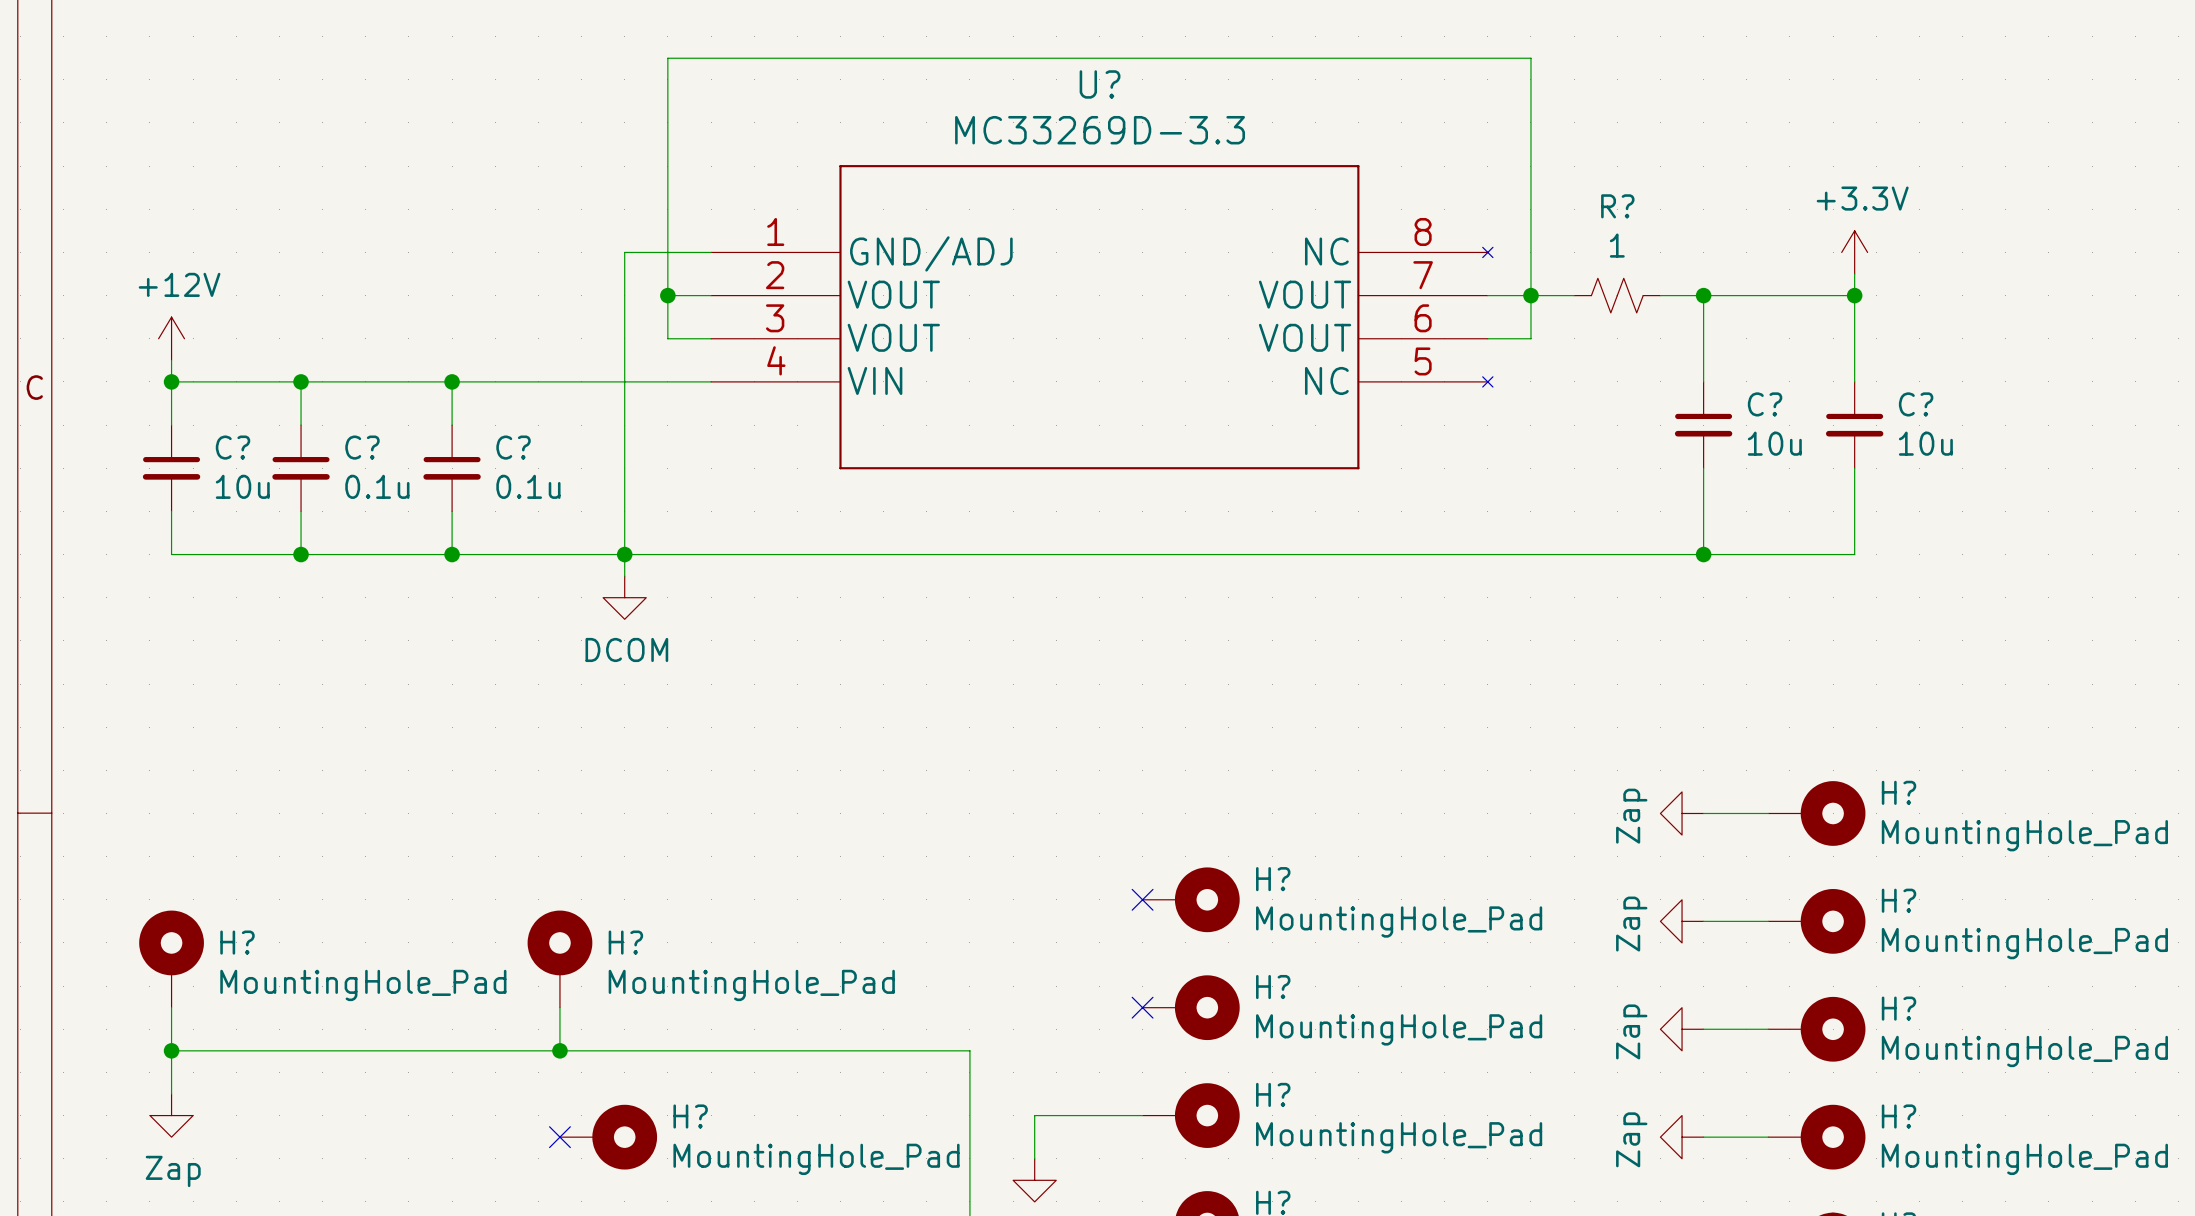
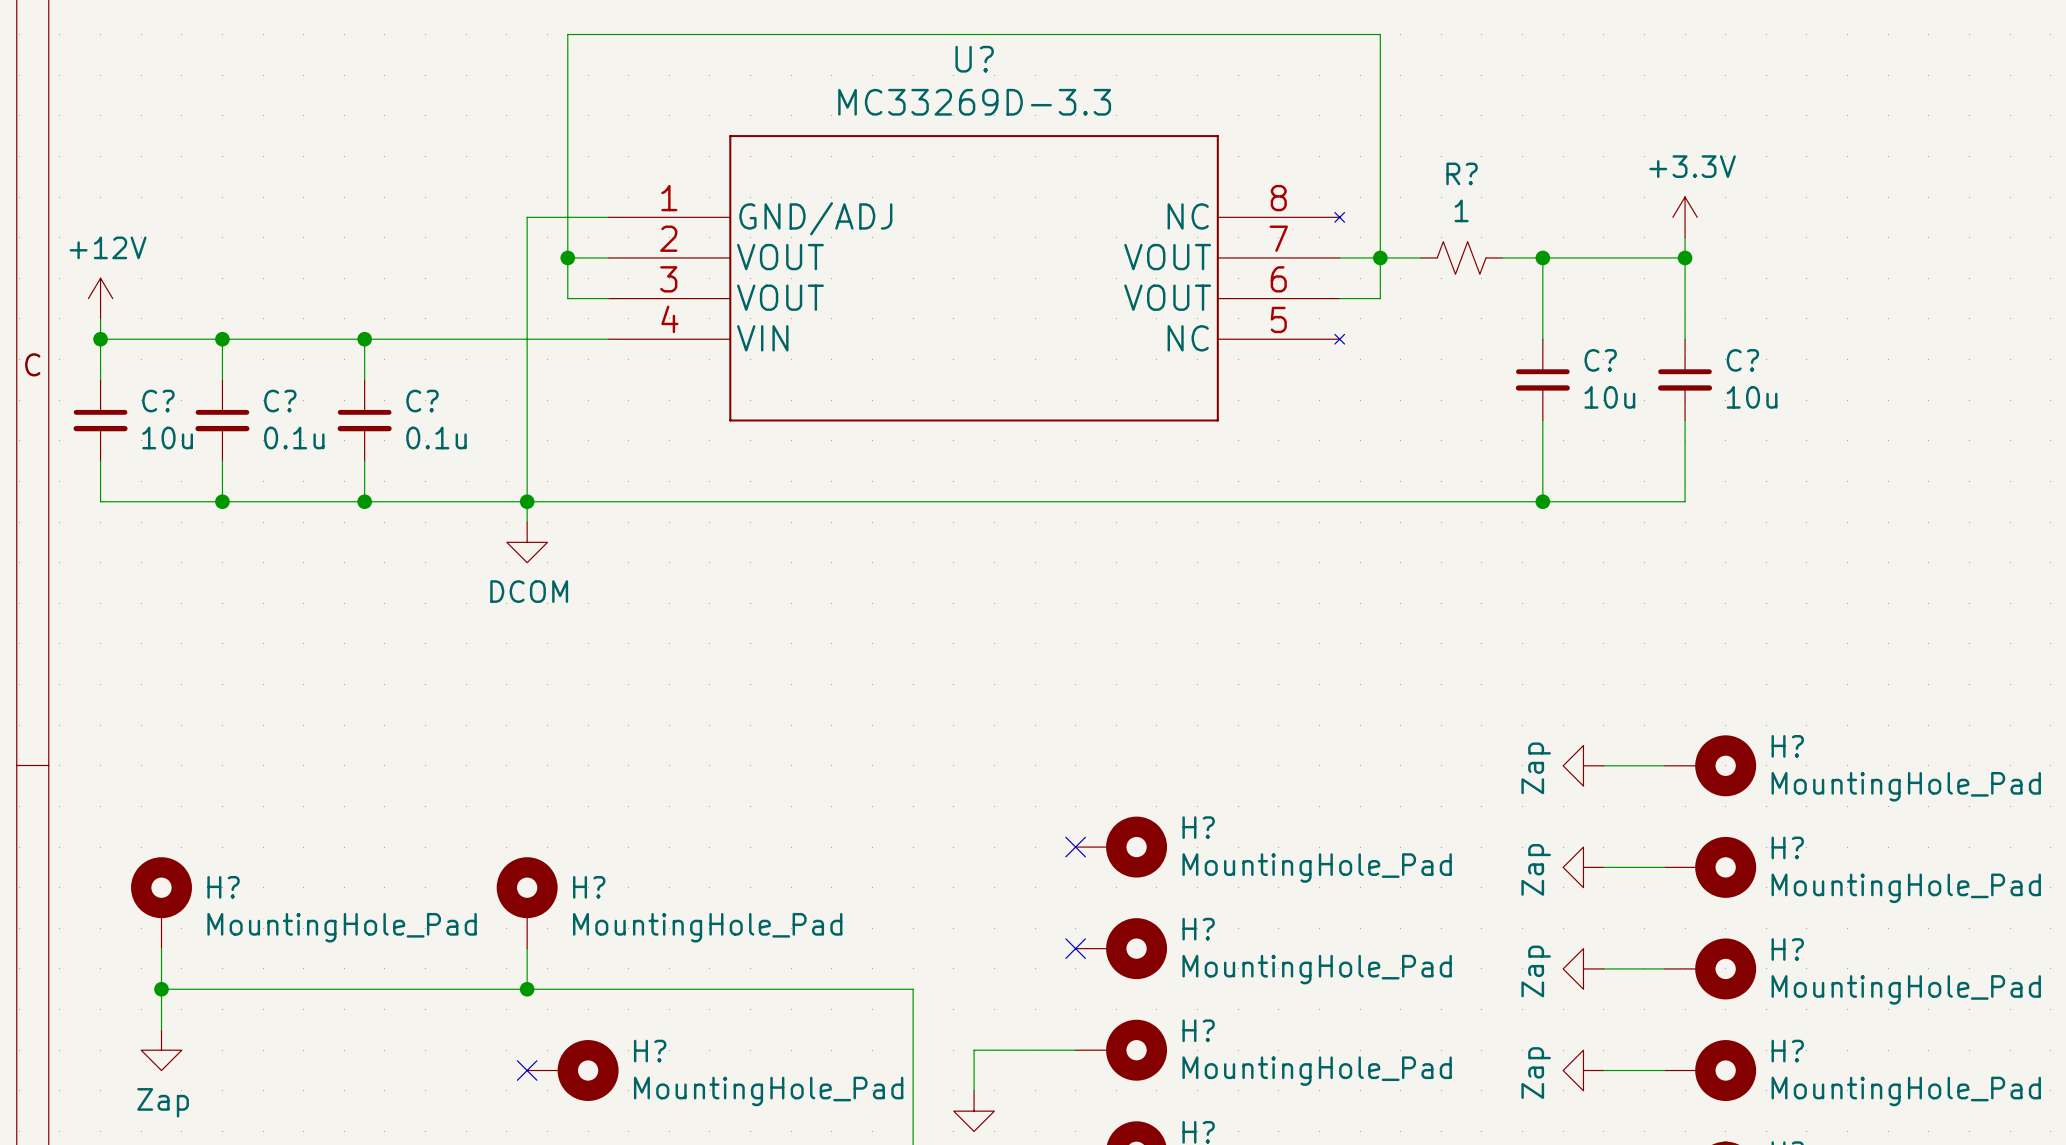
wire: (711, 252) (624, 252) (624, 576) -> (608, 217) (527, 217) (527, 522)
power symbol position: +3.3V (1854, 252) -> +3.3V (1685, 217)
junction: none -> (1380, 257)
junction: none -> (1542, 257)
junction: none -> (1685, 257)
wire: (1854, 274) (1854, 381) -> (1685, 237) (1685, 339)
wire: (667, 295) (711, 295) -> (567, 257) (608, 257)
junction position: (667, 295) -> (567, 257)
wire: (1487, 295) (1574, 295) -> (1339, 257) (1420, 257)
junction: (1530, 295) -> none
R? position: (1617, 295) -> (1461, 257)
wire: (1660, 295) (1854, 295) -> (1502, 257) (1685, 257)
wire: (1703, 295) (1703, 381) -> (1542, 257) (1542, 339)
junction: (1703, 295) -> none
junction: (1854, 295) -> none
U? position: (1101, 317) -> (976, 278)
power symbol position: +12V (171, 338) -> +12V (100, 298)
wire: (711, 338) (667, 338) (667, 58) (1530, 58) (1530, 338) (1487, 338) -> (608, 298) (567, 298) (567, 34) (1380, 34) (1380, 298) (1339, 298)
junction: none -> (100, 339)
wire: (171, 360) (171, 425) -> (100, 318) (100, 379)
junction: none -> (222, 339)
junction: none -> (364, 339)
wire: (171, 381) (711, 381) -> (100, 339) (608, 339)
junction: (171, 381) -> none
wire: (301, 381) (301, 425) -> (222, 339) (222, 379)
junction: (301, 381) -> none
wire: (452, 381) (452, 425) -> (364, 339) (364, 379)
junction: (452, 381) -> none
C?: none -> 10u (1542, 379)
C?: none -> 10u (1685, 379)
C?: 10u (1703, 425) -> none
C?: 10u (1854, 425) -> none
C?: none -> 0.1u (222, 420)
C?: none -> 0.1u (364, 420)
C? position: (171, 468) -> (100, 420)
C?: 0.1u (301, 468) -> none
C?: 0.1u (452, 468) -> none
wire: (1703, 468) (1703, 554) -> (1542, 420) (1542, 501)
wire: (1854, 468) (1854, 554) (171, 554) (171, 511) -> (1685, 420) (1685, 501) (100, 501) (100, 461)
wire: (301, 511) (301, 554) -> (222, 461) (222, 501)
wire: (452, 511) (452, 554) -> (364, 461) (364, 501)
junction: none -> (222, 501)
junction: none -> (364, 501)
junction: none -> (527, 501)
junction: (301, 554) -> none
junction: (452, 554) -> none
junction: (624, 554) -> none
junction position: (1703, 554) -> (1542, 501)
power symbol position: DCOM (624, 597) -> DCOM (527, 542)

